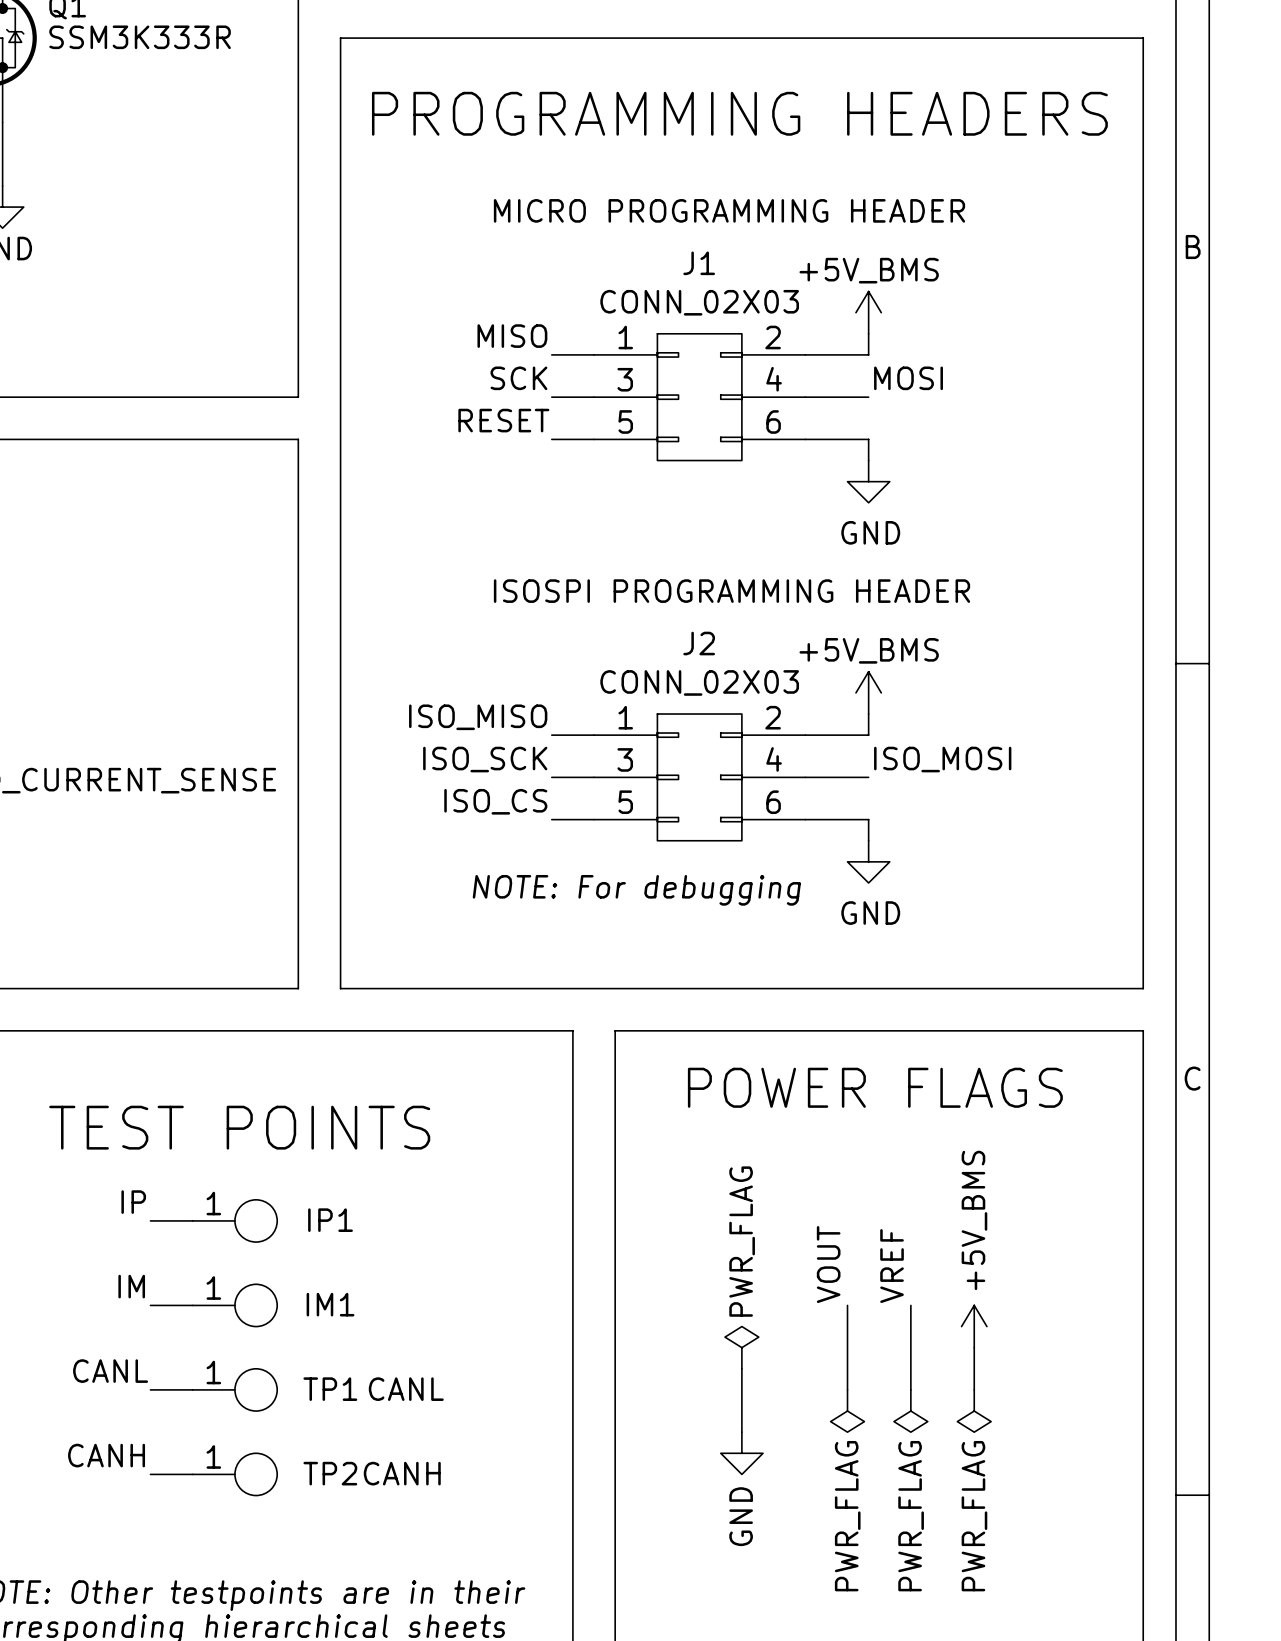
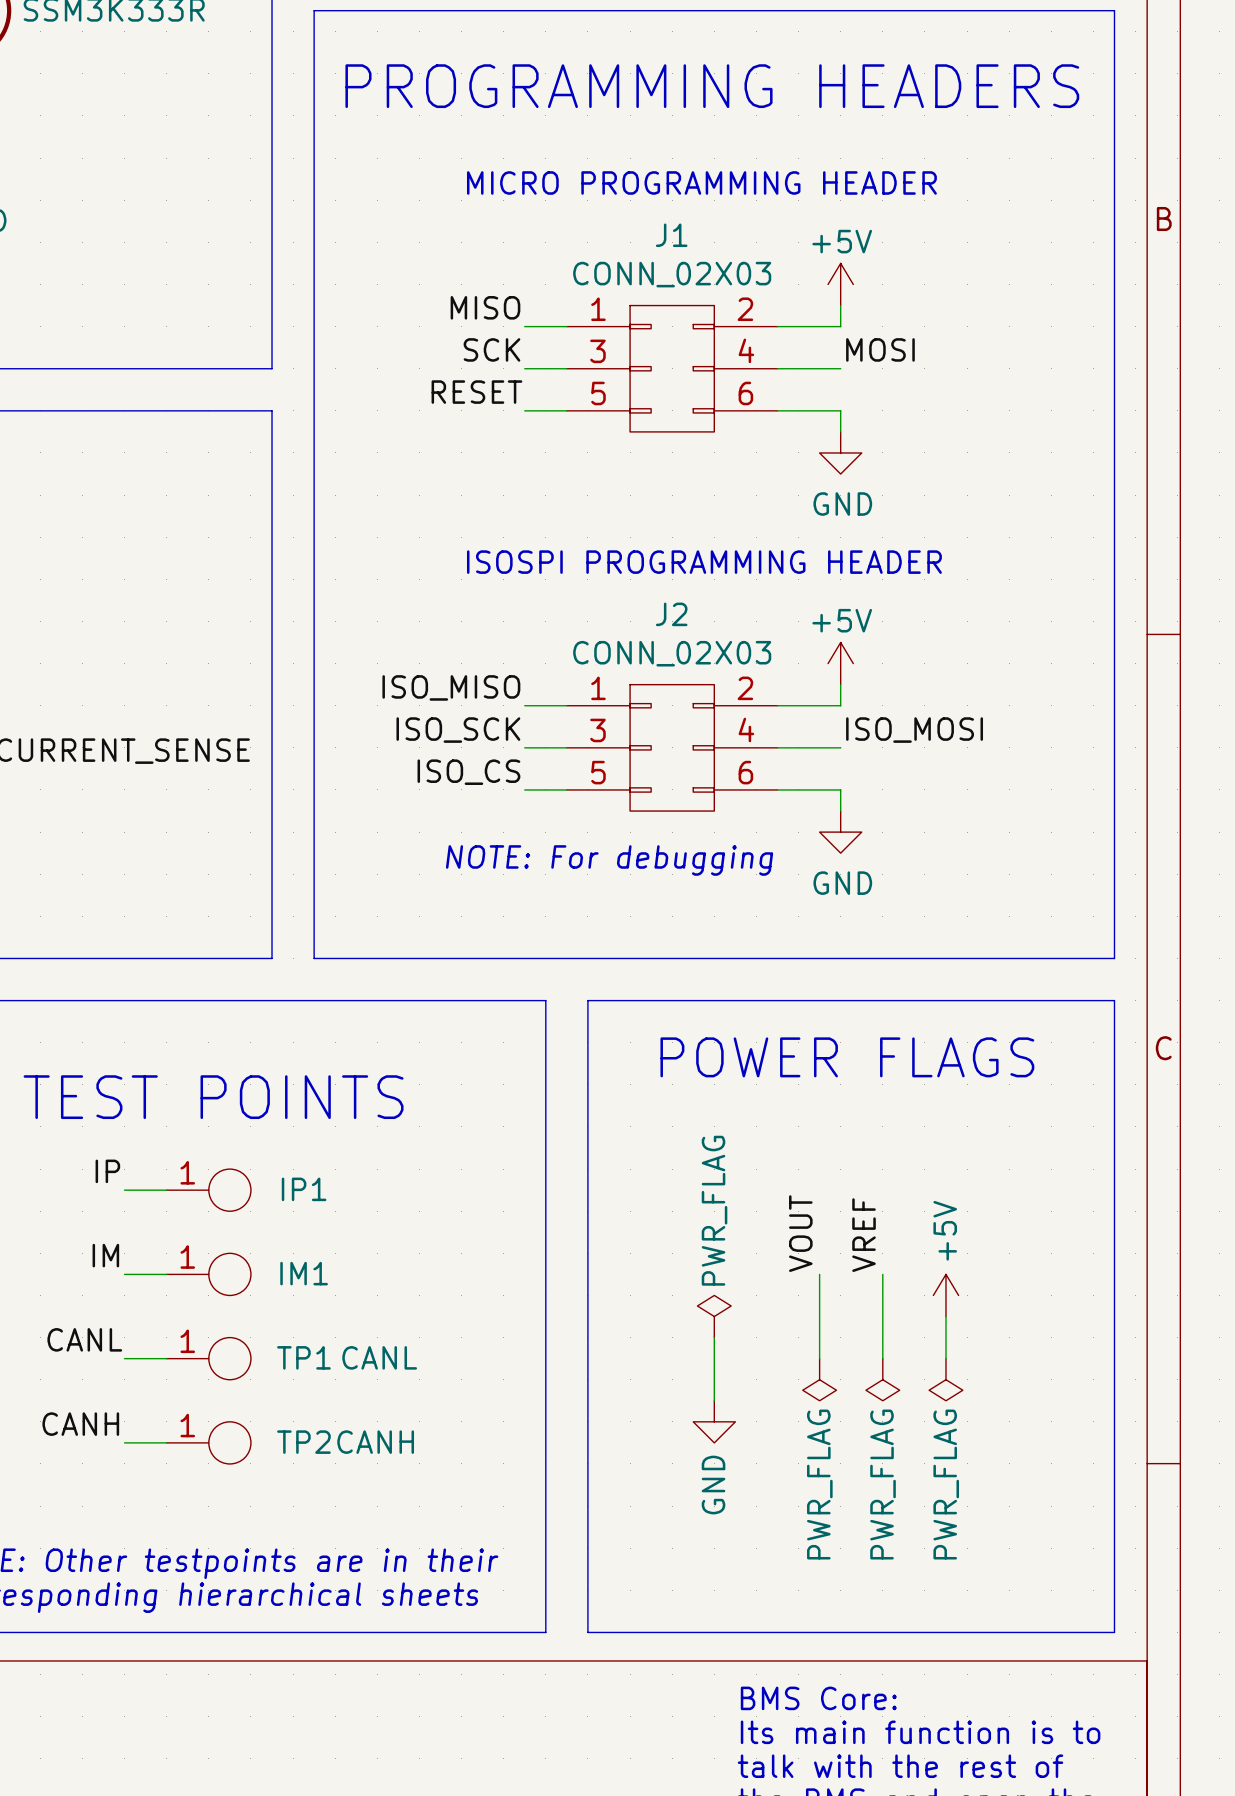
power symbol: +5V_BMS (868, 312) -> +5V (840, 284)
power symbol: +5V_BMS (868, 692) -> +5V (840, 663)
power symbol: +5V_BMS (974, 1326) -> +5V (945, 1295)

